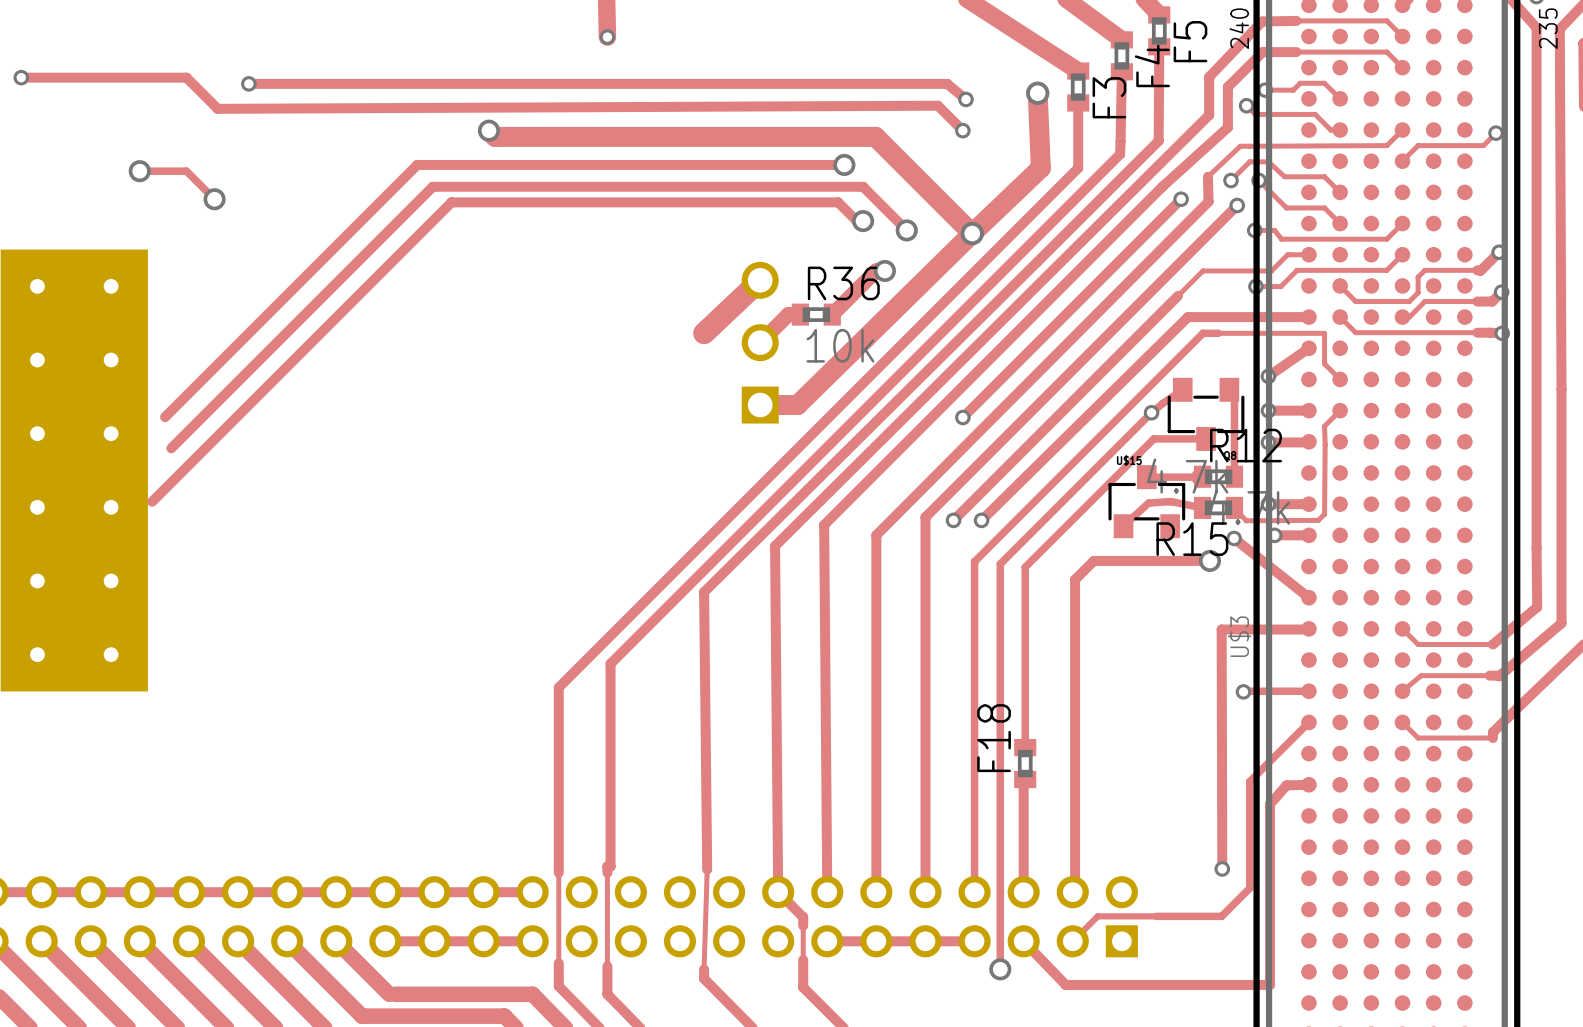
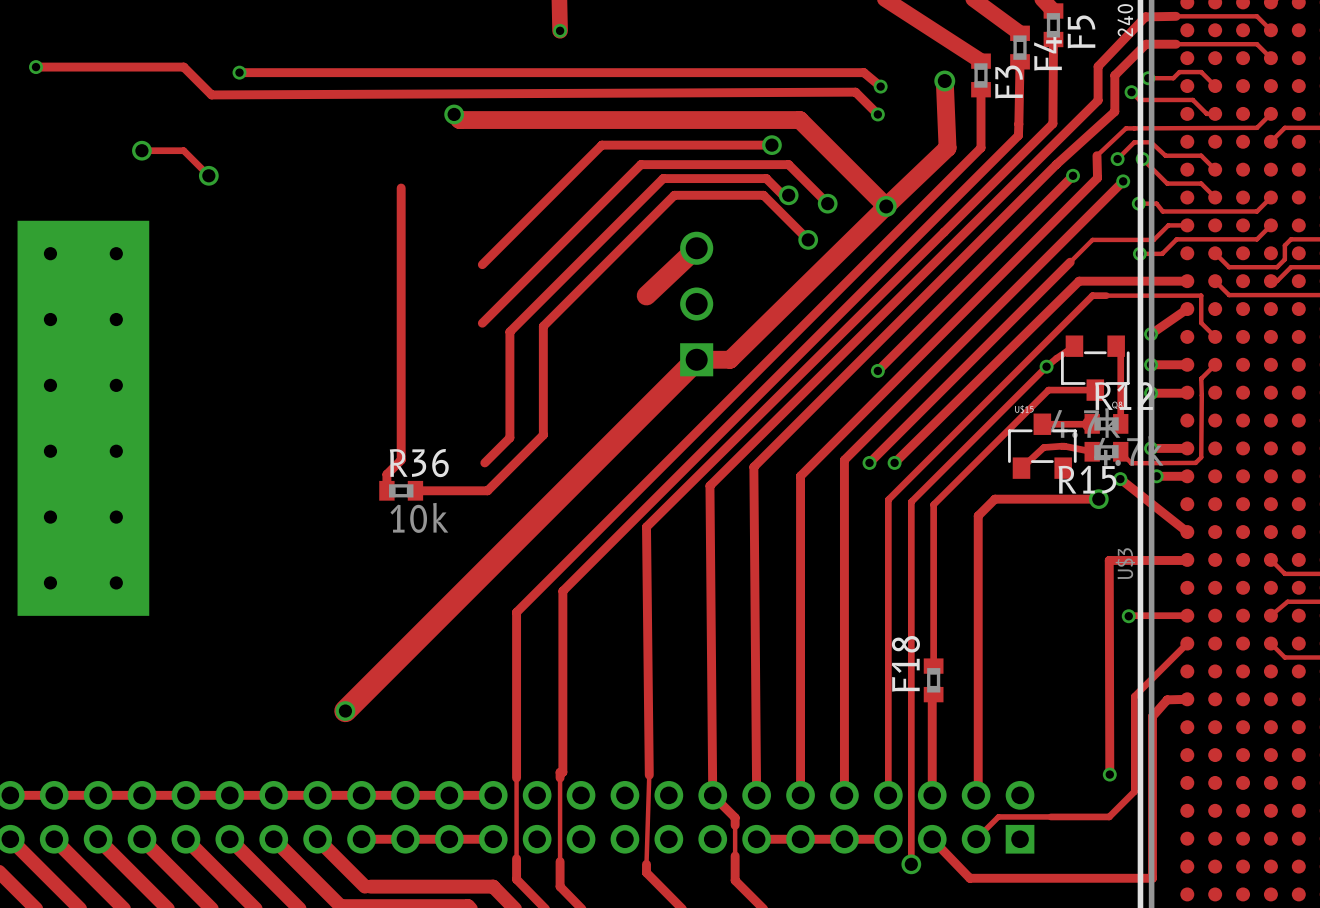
track: (654, 164) (417, 164) (165, 417) -> (601, 145) (482, 264)
track: (697, 186) (432, 186) (171, 448) -> (640, 164) (482, 323)
track: (722, 202) (451, 202) (152, 501) -> (663, 178) (509, 331) (509, 437) (484, 462)
track: none -> (401, 188) (401, 460) (386, 474) (386, 490)
track: (884, 270) (875, 270) (832, 314) -> (808, 239) (763, 195) (674, 195) (543, 326) (543, 435) (487, 490) (415, 490)
track: (800, 314) (788, 314) (760, 342) -> none
R36 position: (816, 314) -> (401, 490)
track: none -> (696, 359) (345, 711)
via: none -> (345, 711)

